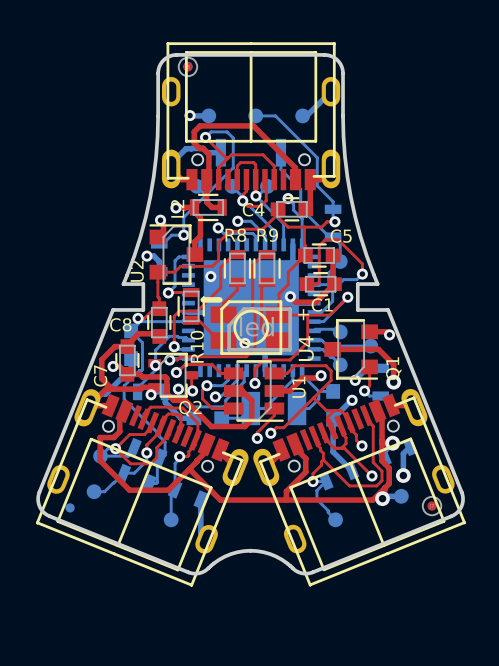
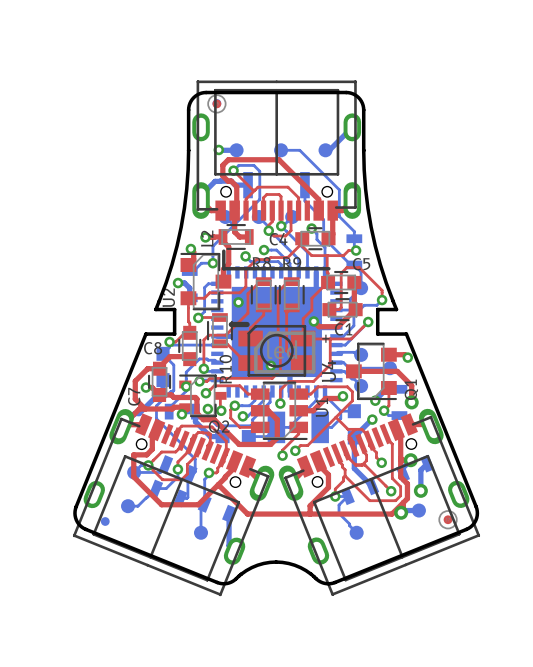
line: none -> (223, 251) (223, 268) (328, 268)

